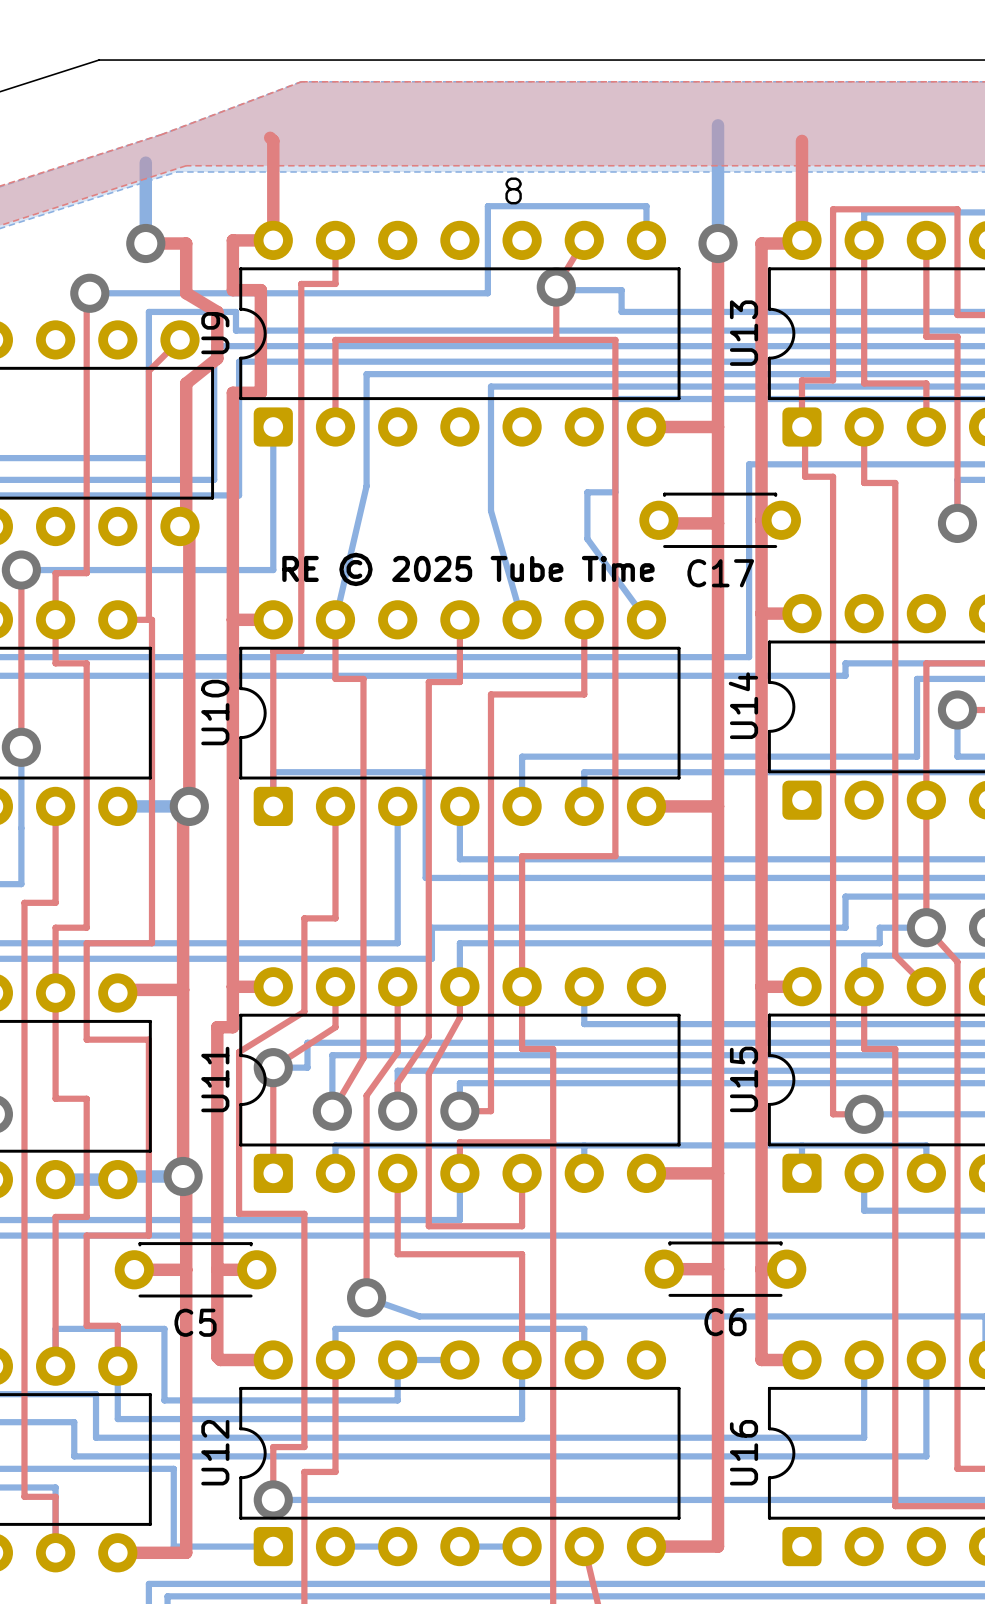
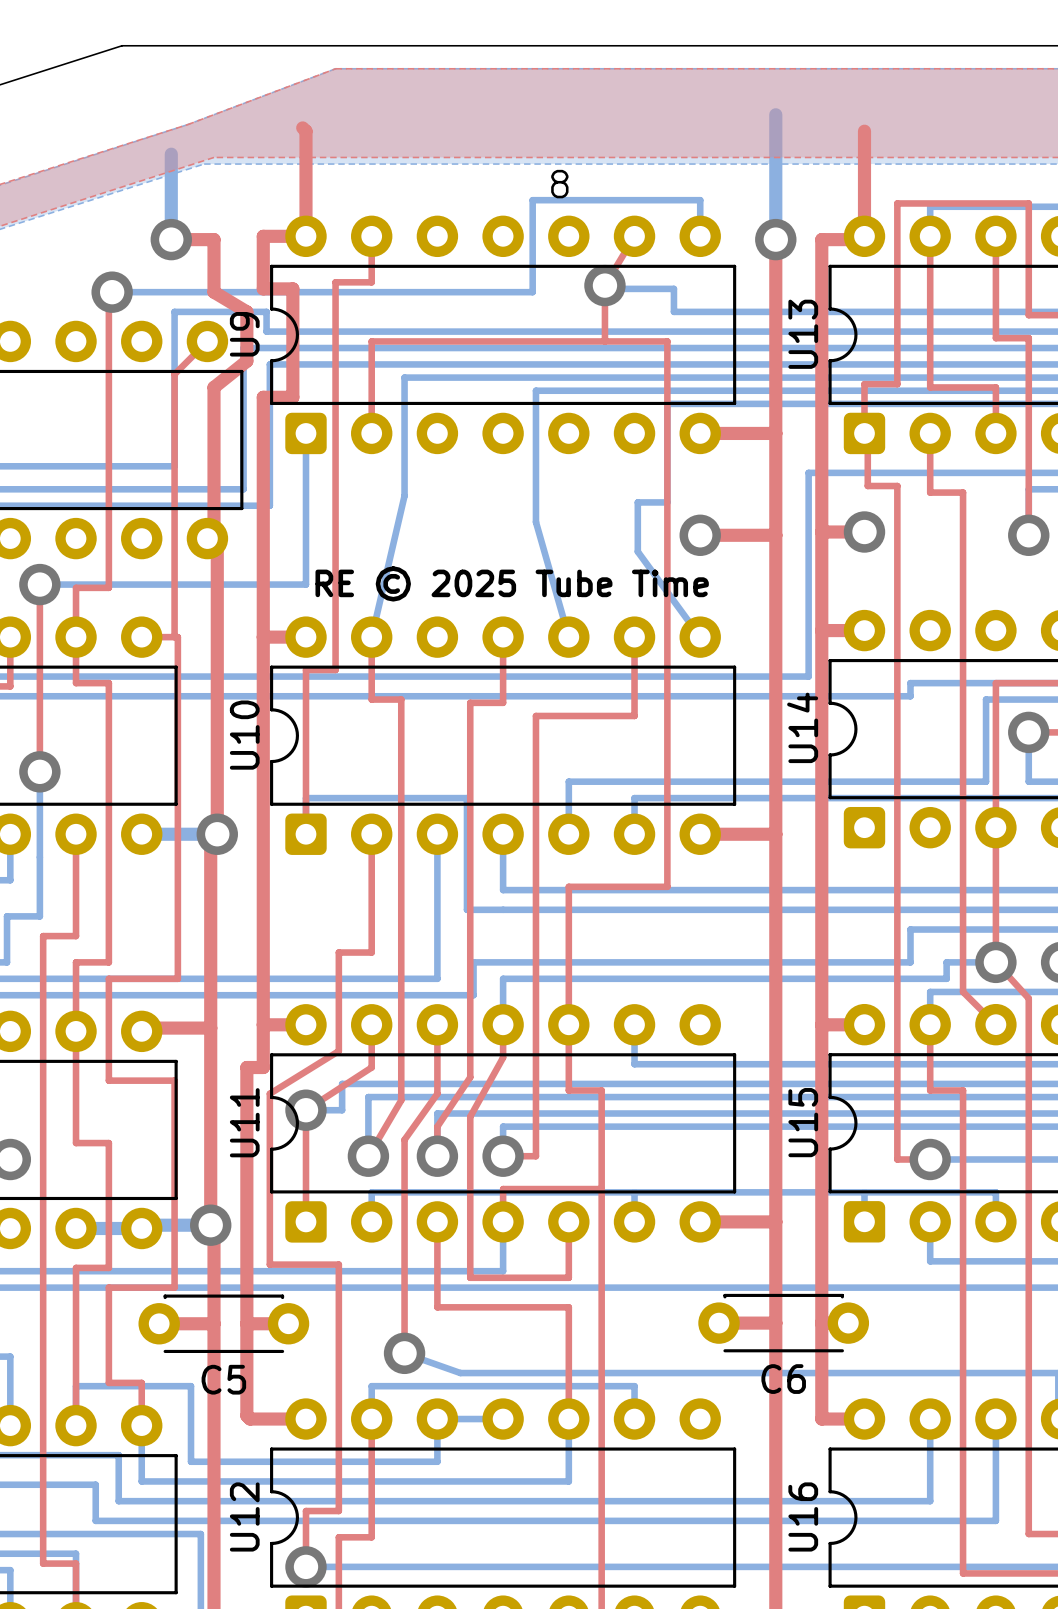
C17: (720, 520) -> none
via: none -> (864, 532)
via: none -> (700, 535)

